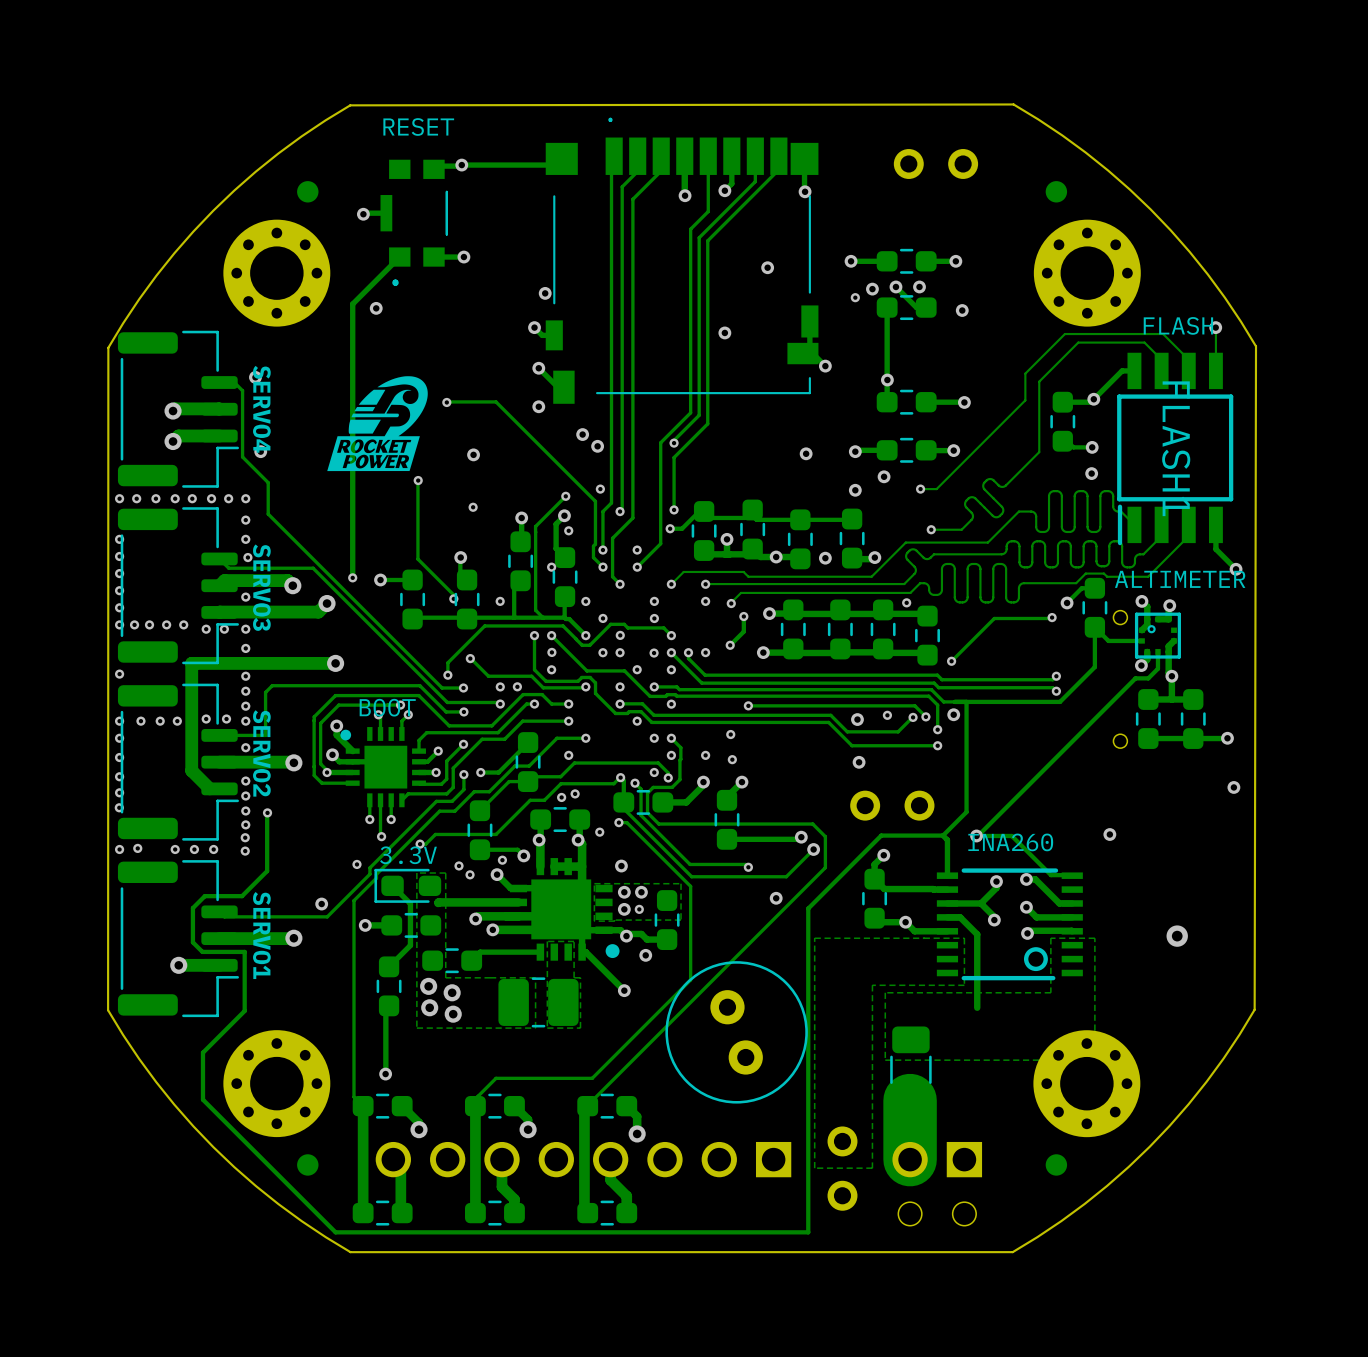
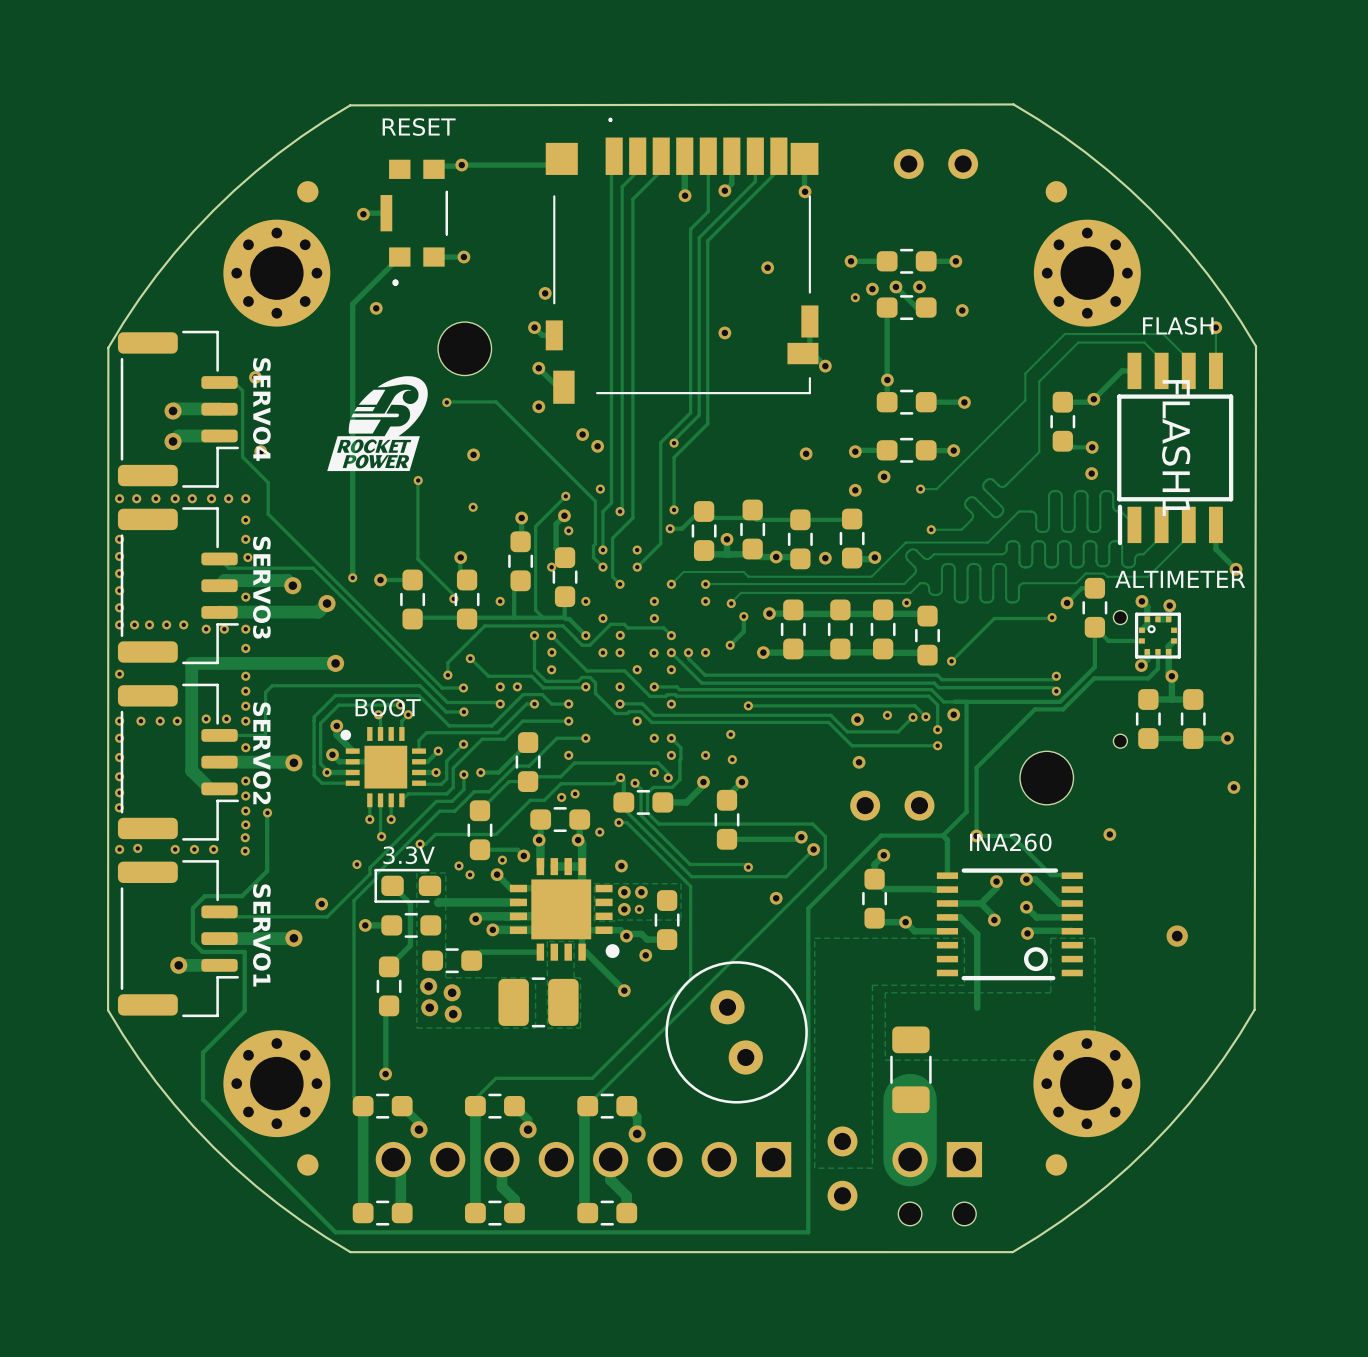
part: none -> (464, 348)
track: (1135, 678) (977, 835) -> (1135, 678) (1094, 678) (1063, 709) (1034, 709) (976, 767) (976, 835)
part: none -> (1046, 778)

